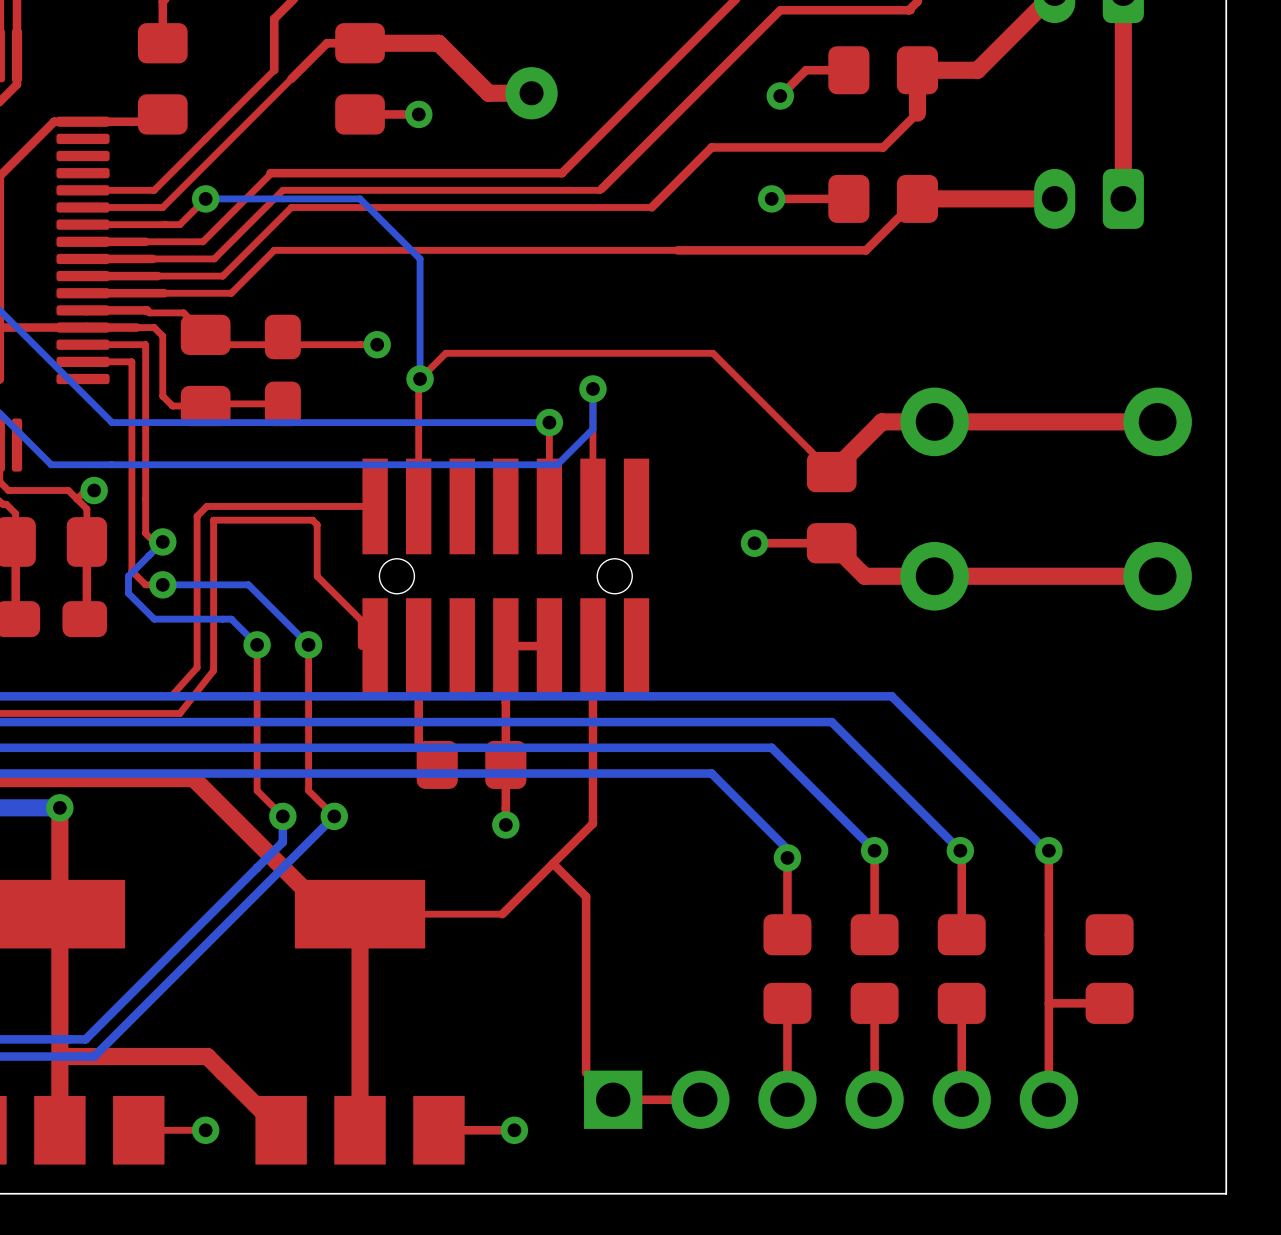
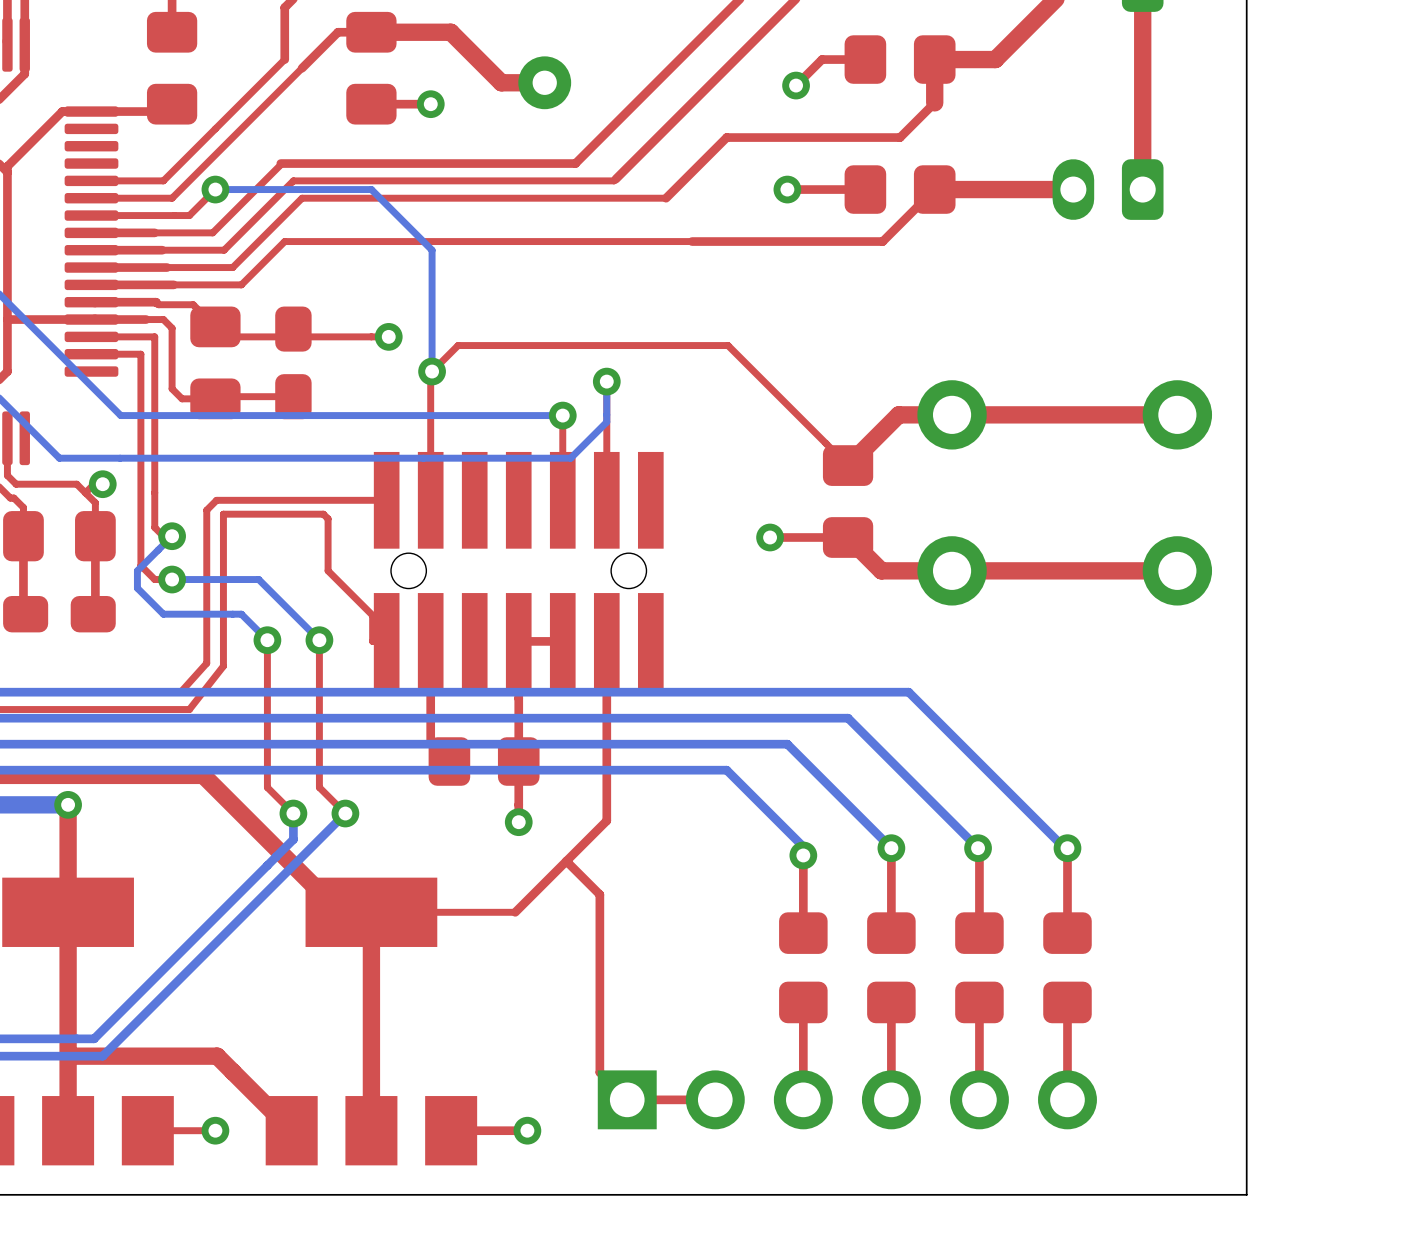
top track: (1048, 934) (1048, 1003) (1109, 1003) -> none
part position: (1109, 969) -> (1067, 967)

